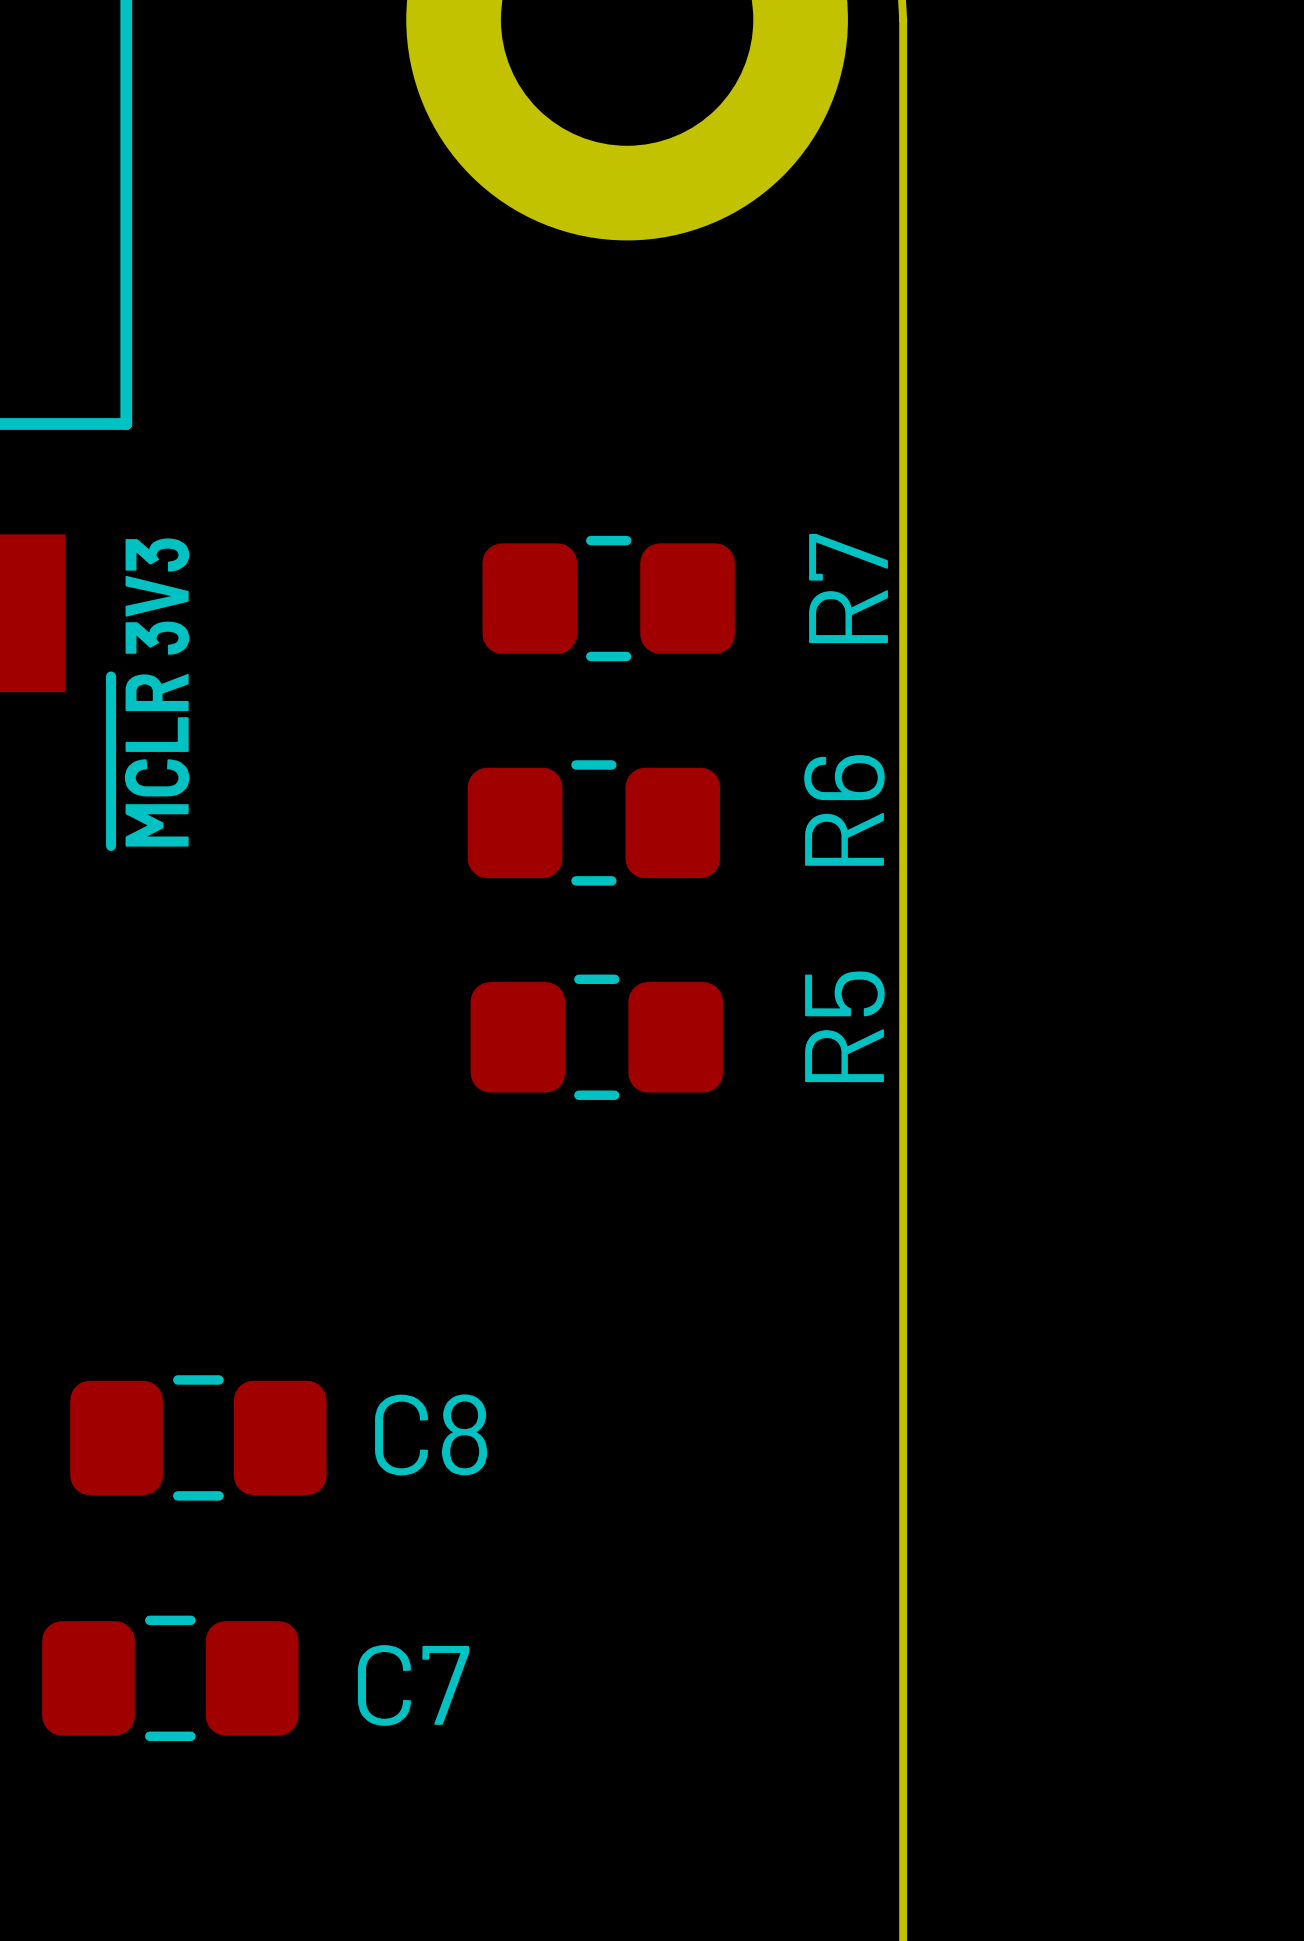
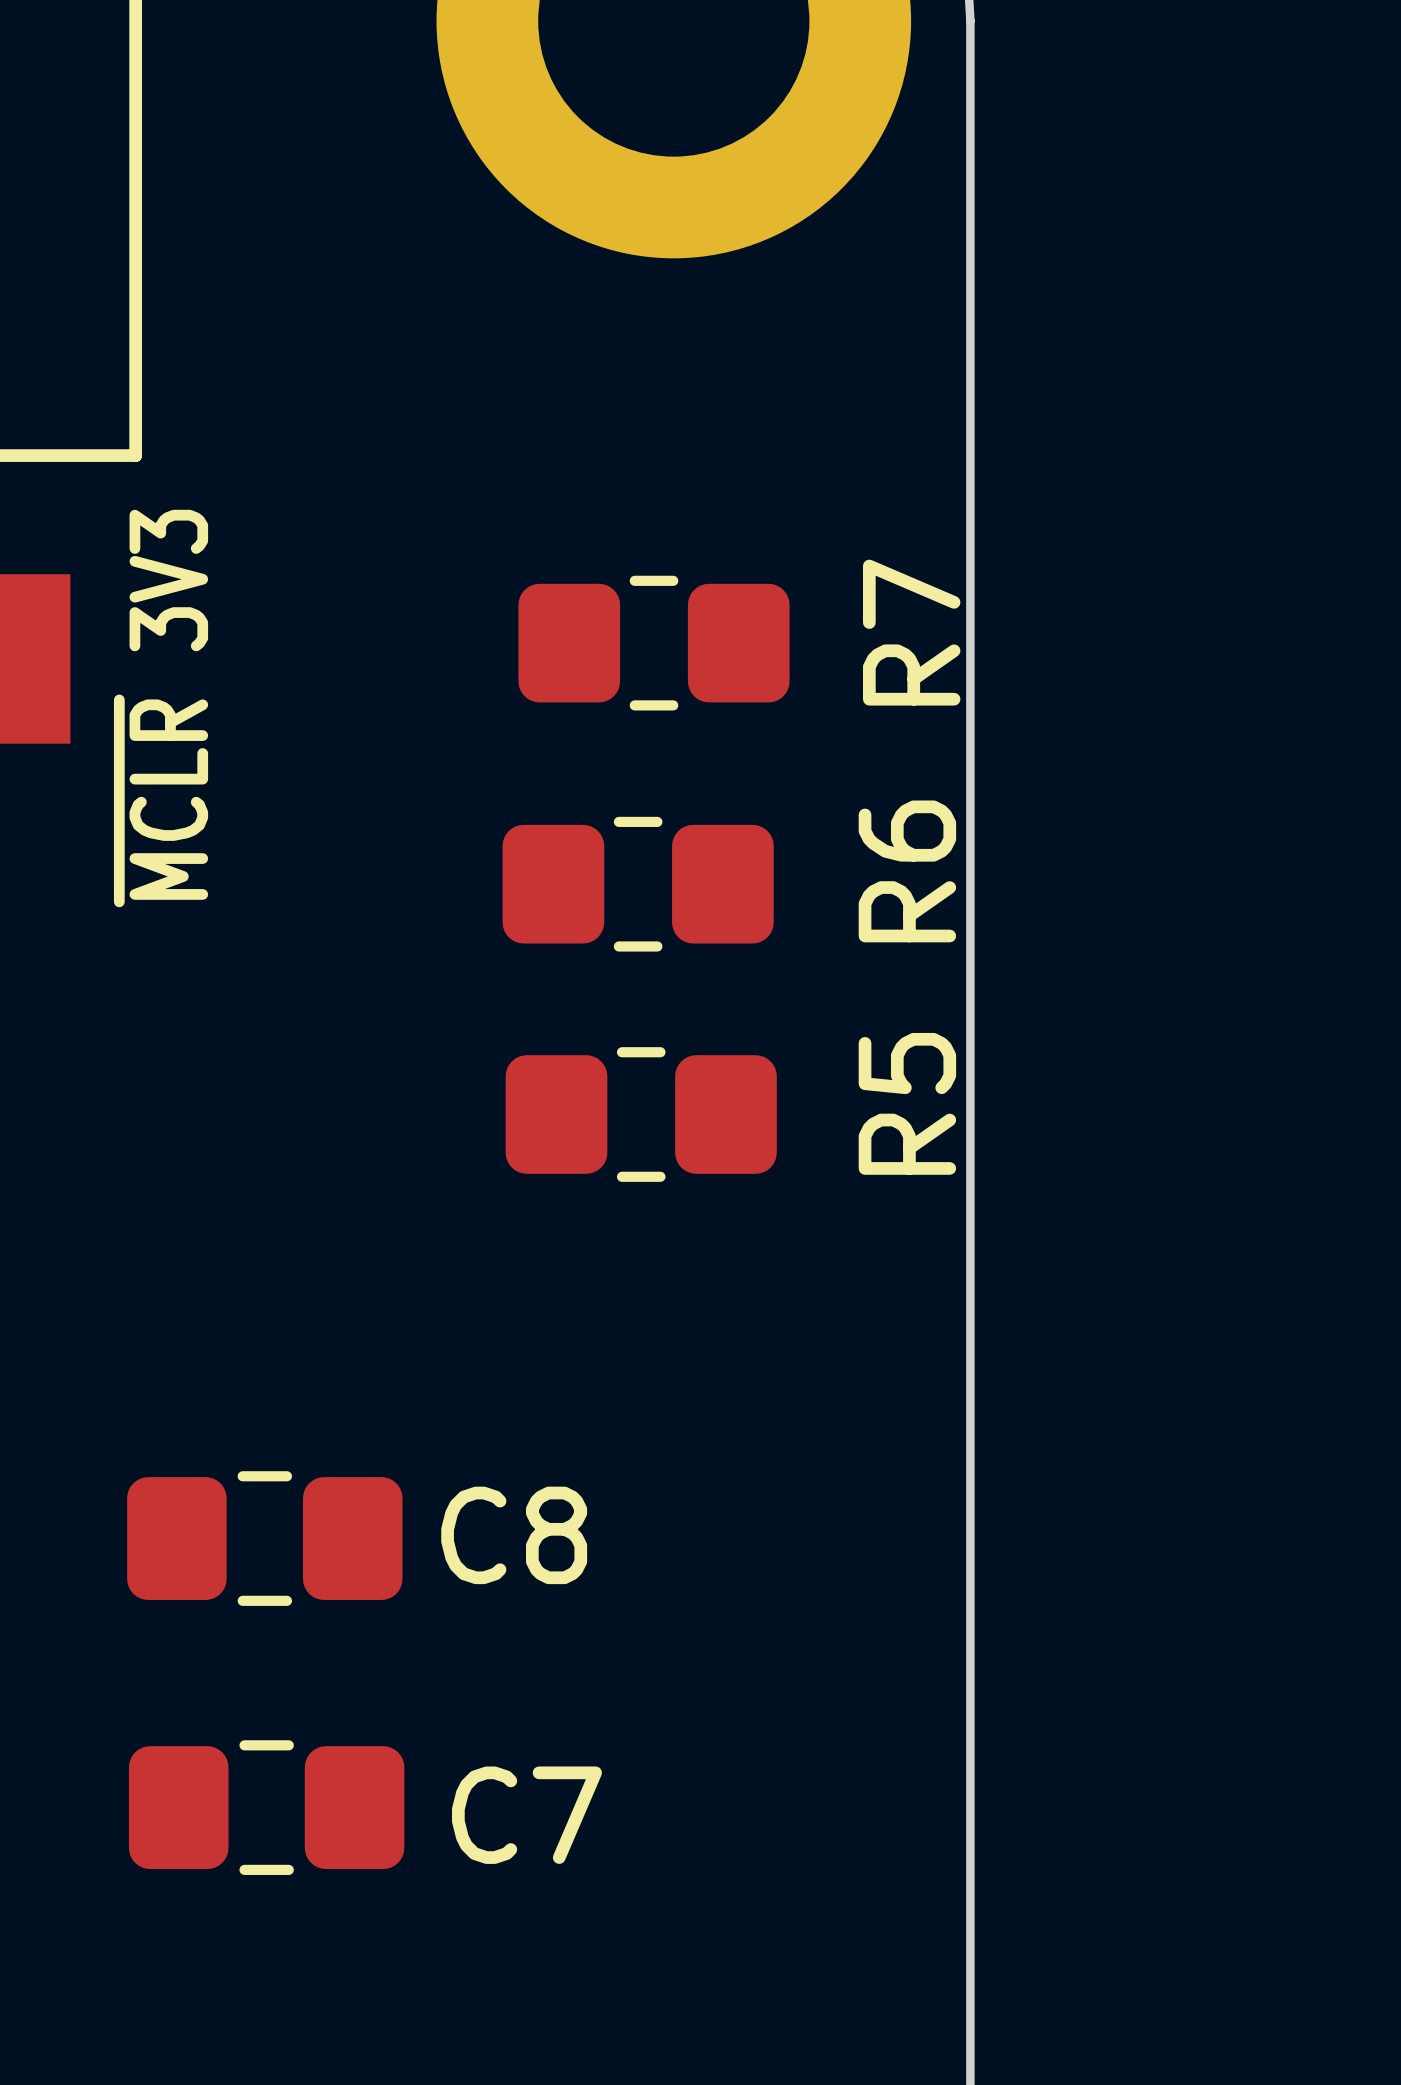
C8 position: (198, 1437) -> (264, 1538)
C7 position: (170, 1678) -> (266, 1807)

